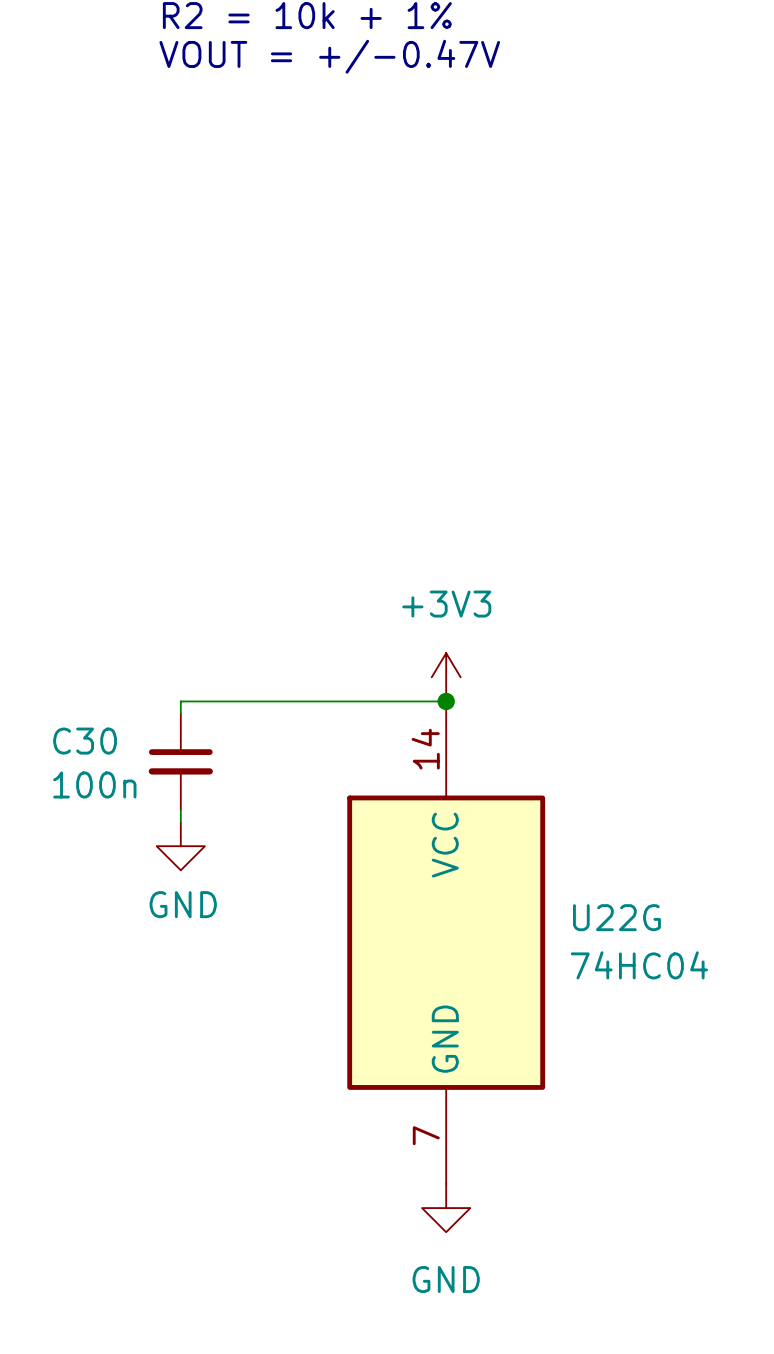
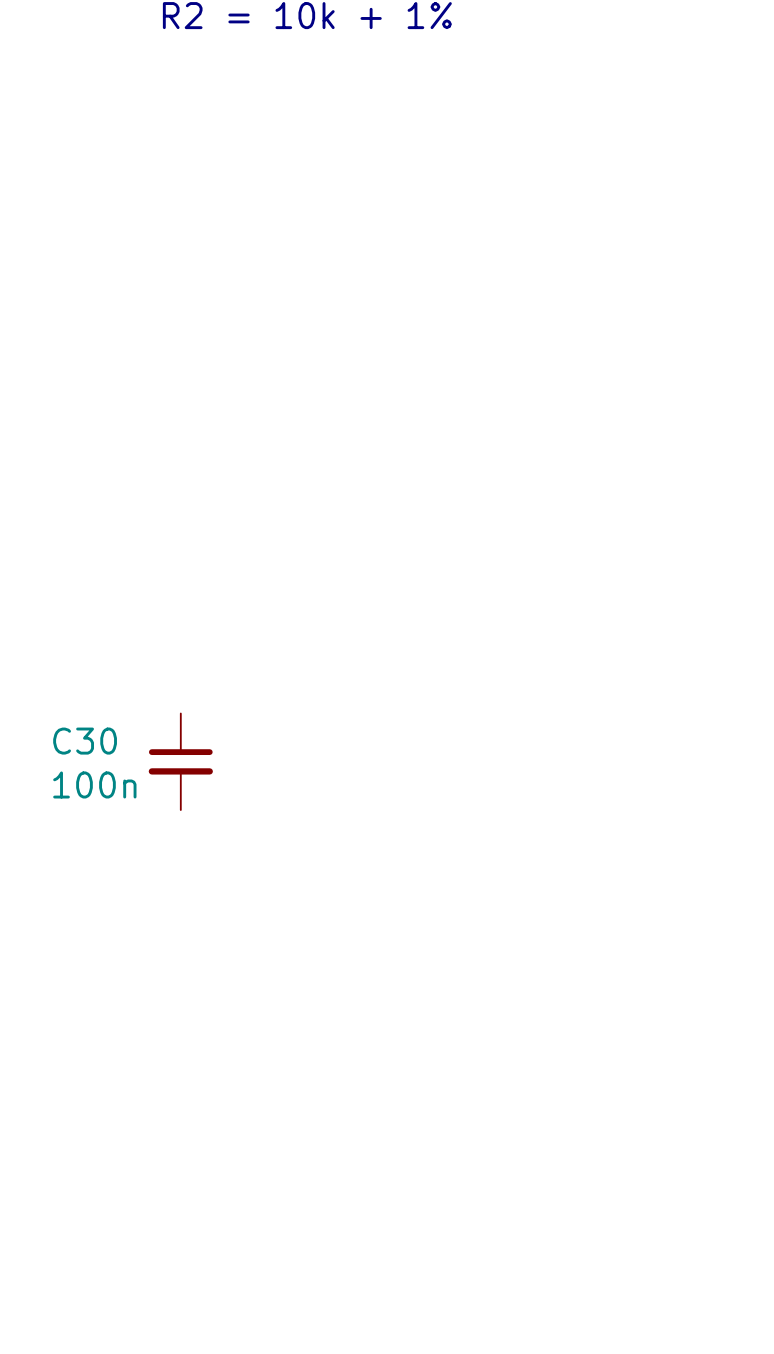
text: VOUT = +/-0.47V (329, 56) -> none
power symbol: +3V3 (446, 677) -> none
wire: (446, 701) (180, 701) (180, 713) -> none
junction: (446, 701) -> none
wire: (180, 810) (180, 822) -> none
power symbol: GND (180, 846) -> none
U22G: 74HC04 (446, 942) -> none
power symbol: GND (446, 1208) -> none

